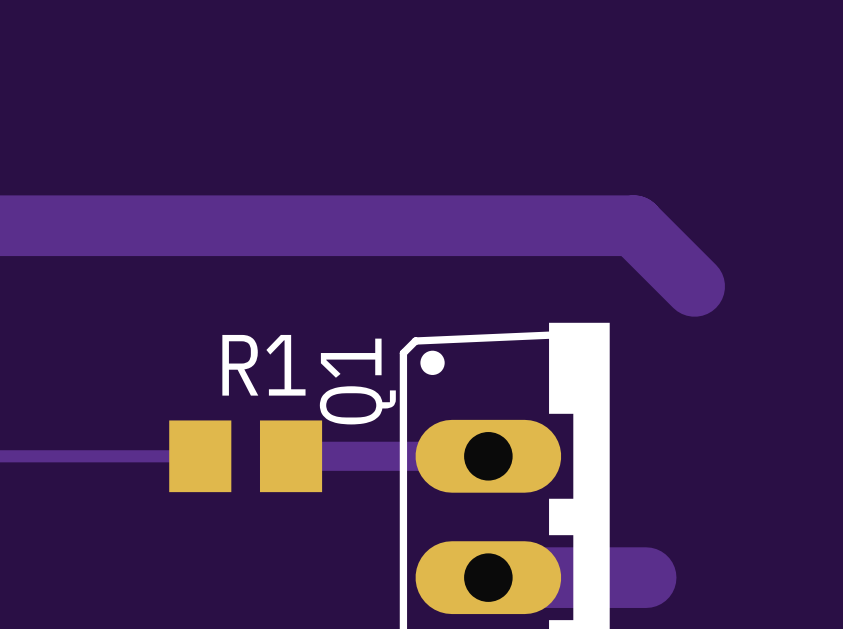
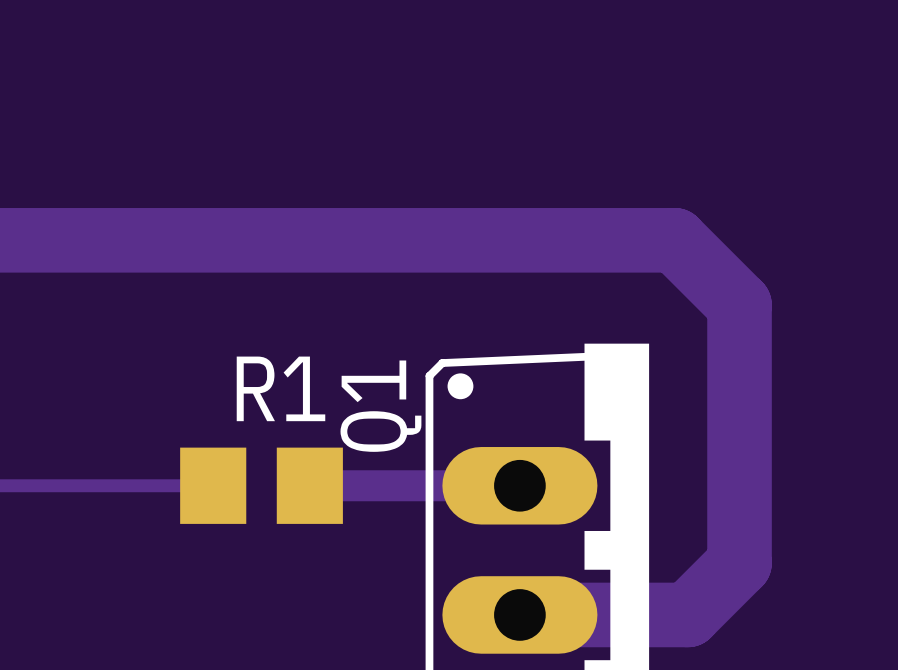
track: none -> (739, 304) (739, 563) (687, 614)

